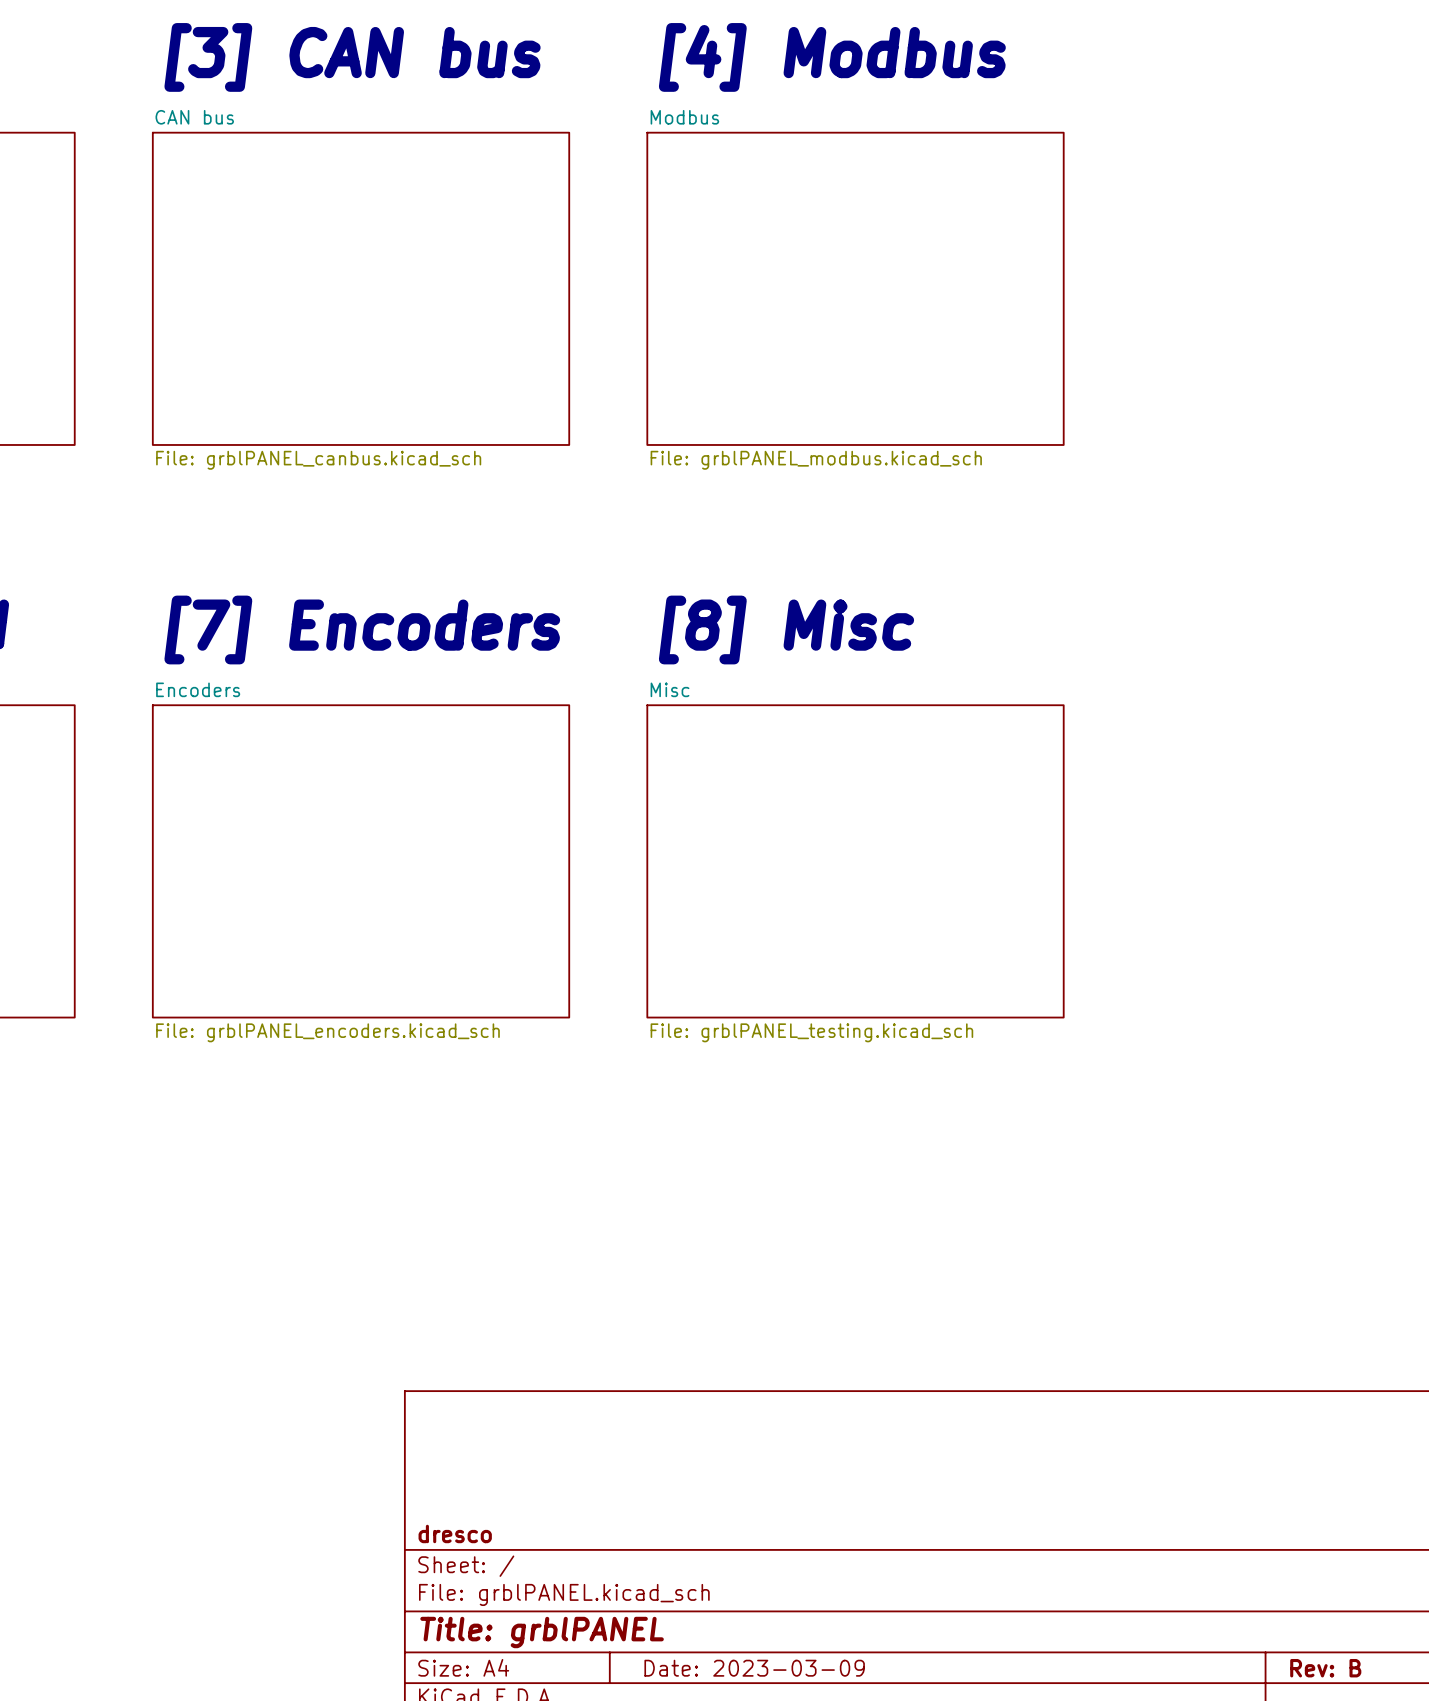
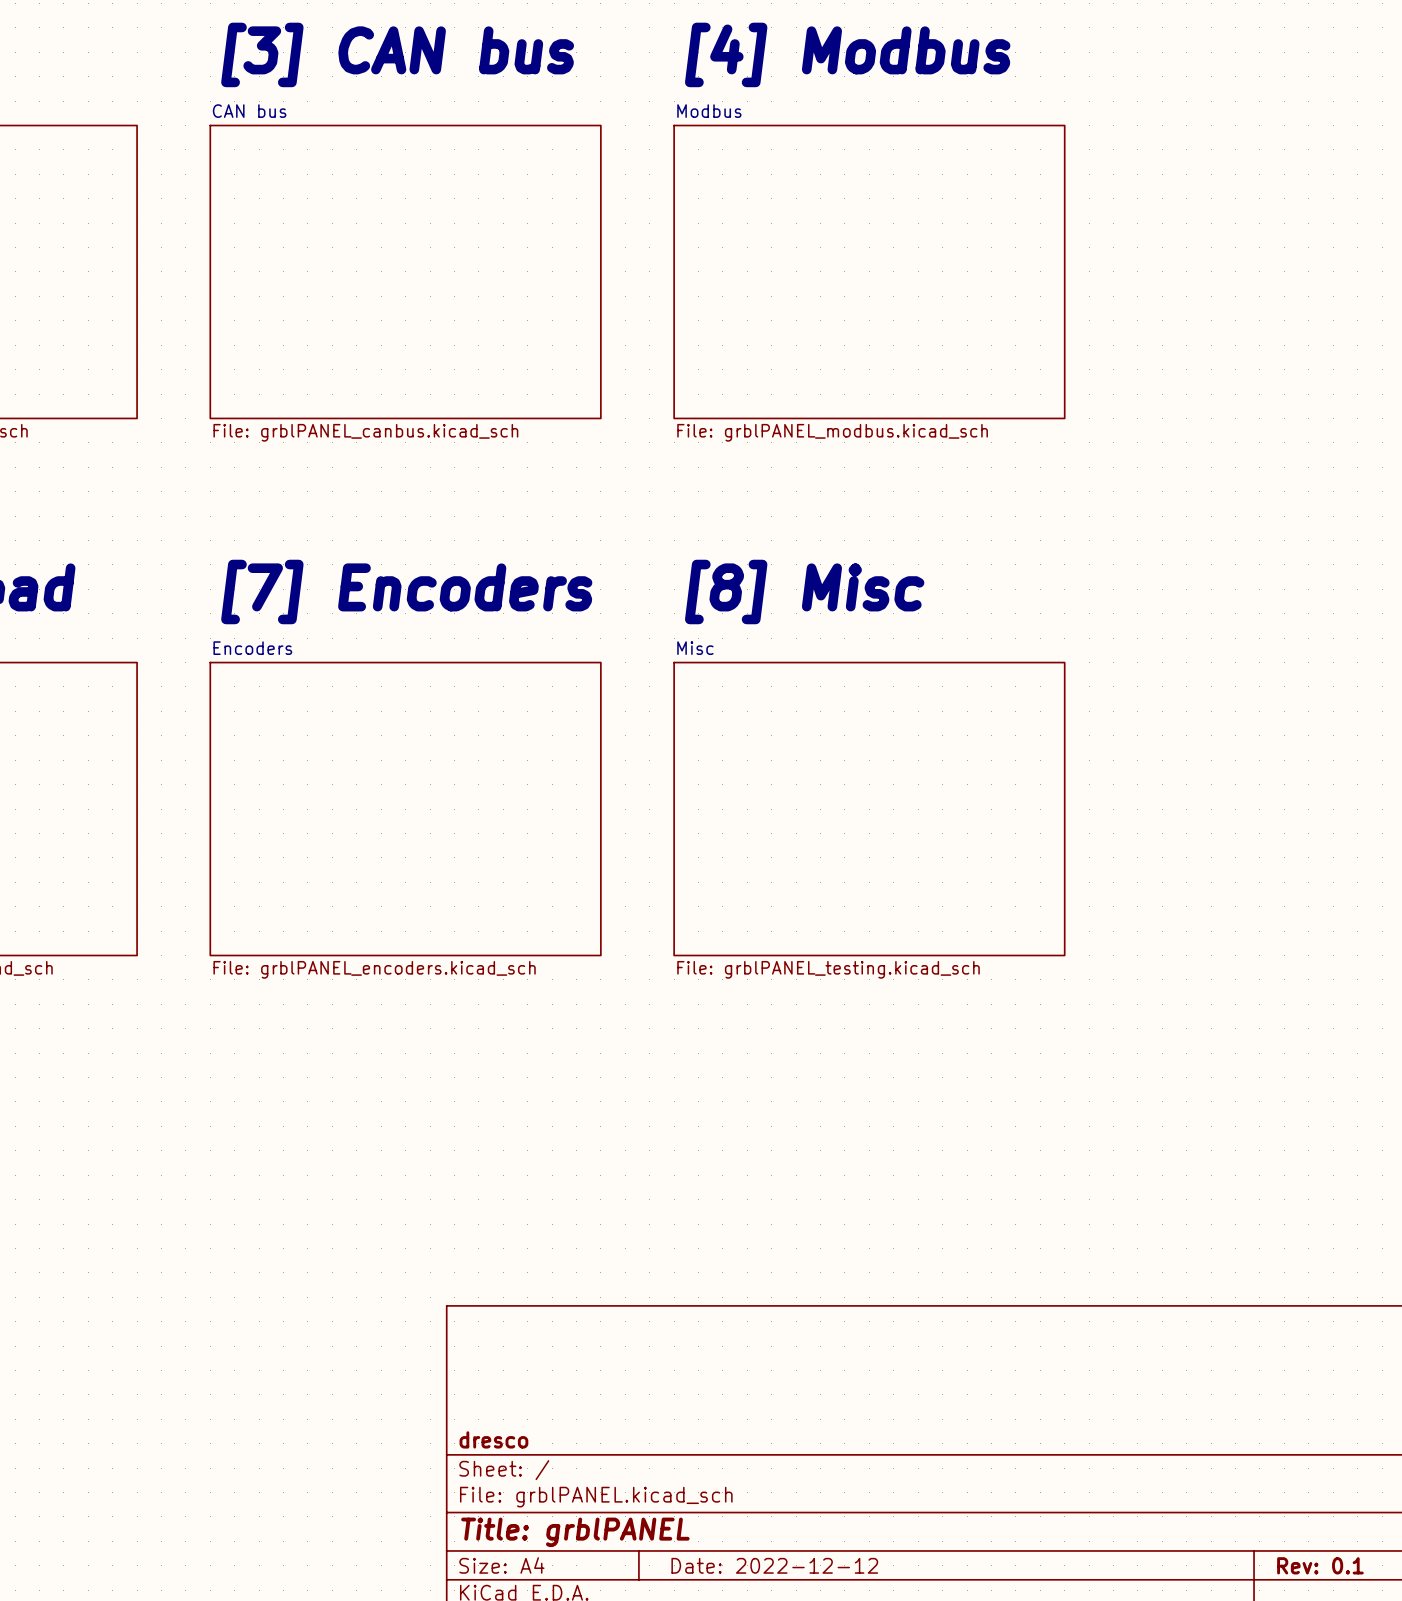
title block: Date: 2023-03-09 (754, 1668) -> Date: 2022-12-12 (774, 1565)
title block: Rev: B (1325, 1668) -> Rev: 0.1 (1320, 1565)

